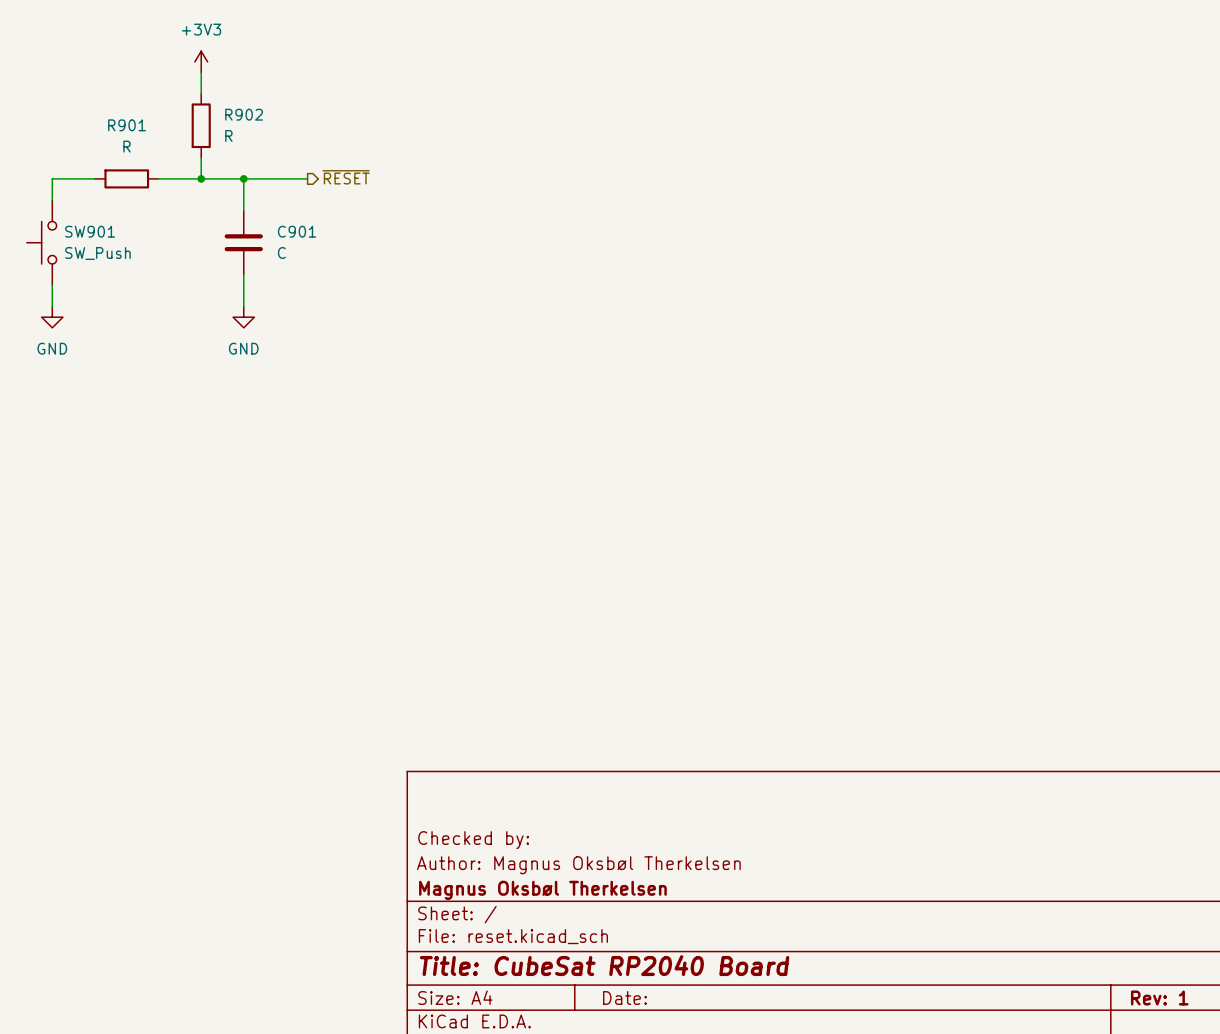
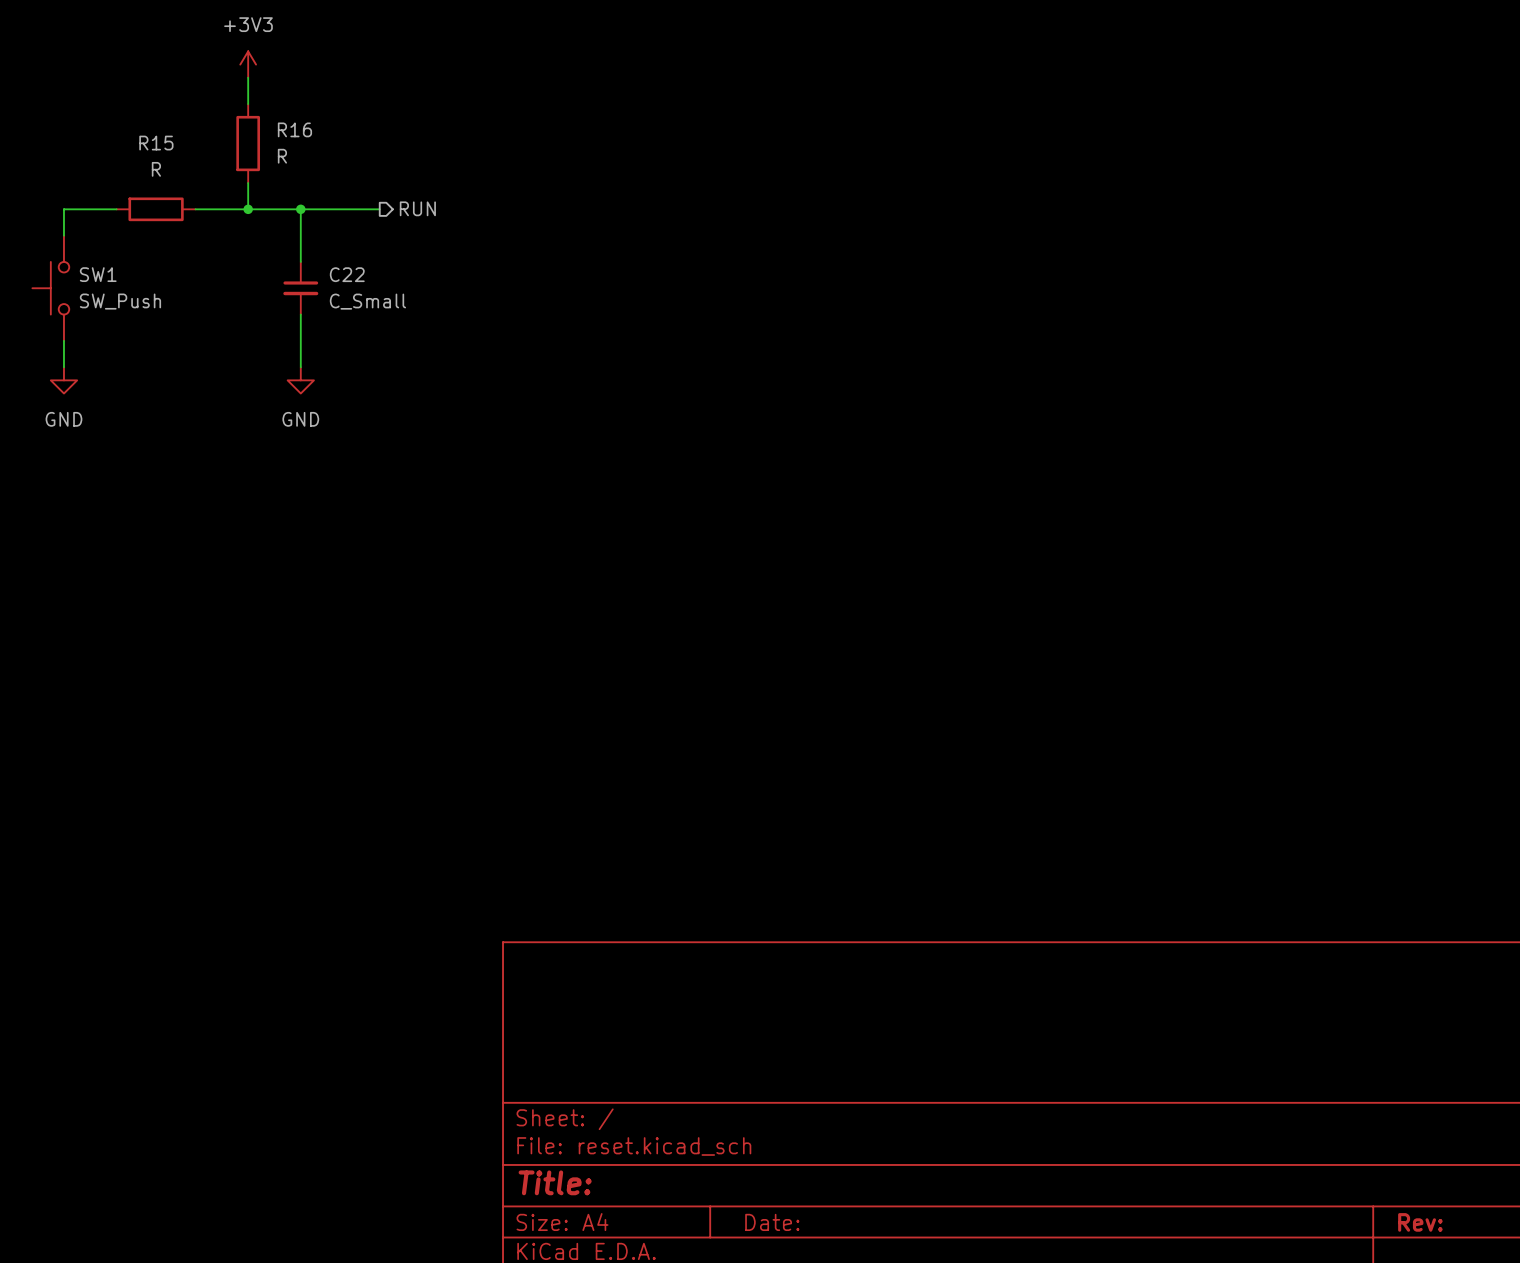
R902 name: R902 (244, 114) -> R16 (294, 129)
R901 name: R901 (127, 125) -> R15 (156, 143)
hierarchical label: ~{RESET} (346, 177) -> RUN (417, 208)
SW901 name: SW901 (90, 231) -> SW1 (98, 274)
C901: C (243, 242) -> none
C22: none -> C_Small (300, 288)
title block: Checked by: (473, 840) -> none
title block: Author: Magnus Oksbøl Therkelsen (578, 865) -> none
title block: Magnus Oksbøl Therkelsen (542, 890) -> none
title block: Title: CubeSat RP2040 Board (604, 965) -> Title: (555, 1182)
title block: Rev: 1 (1159, 997) -> Rev: (1420, 1222)

